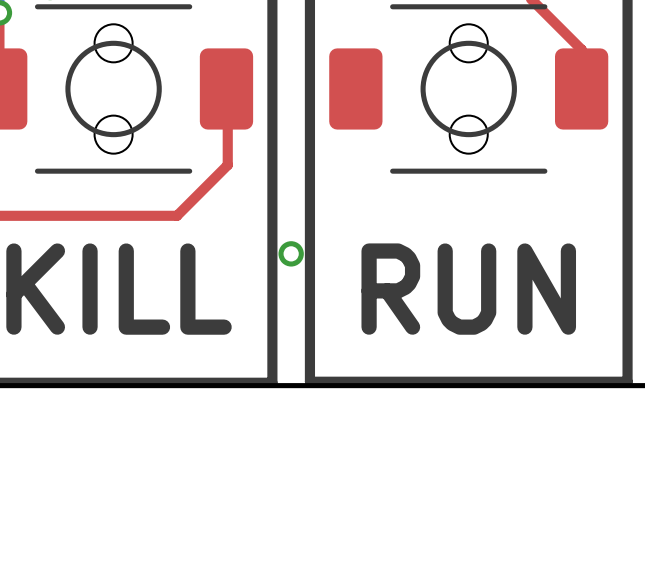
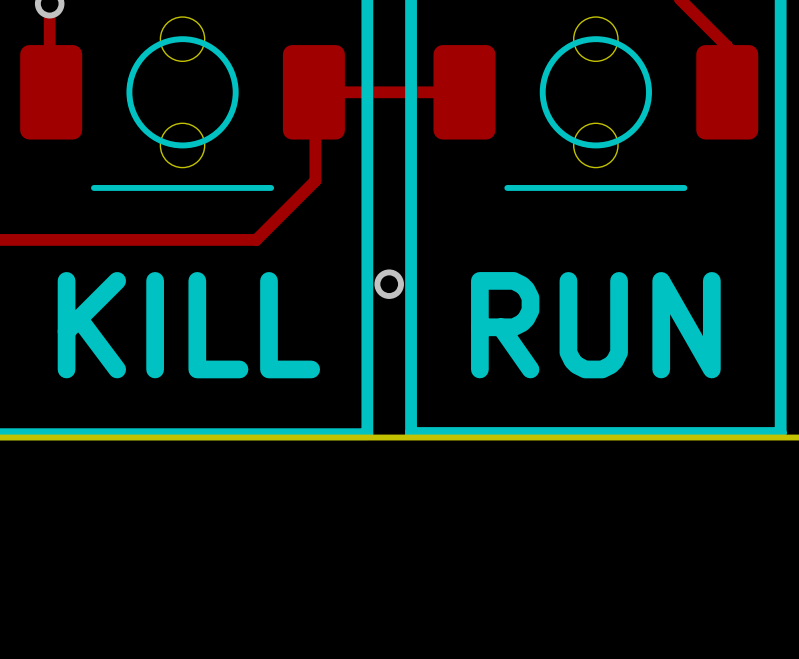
top track: none -> (313, 92) (464, 92)

